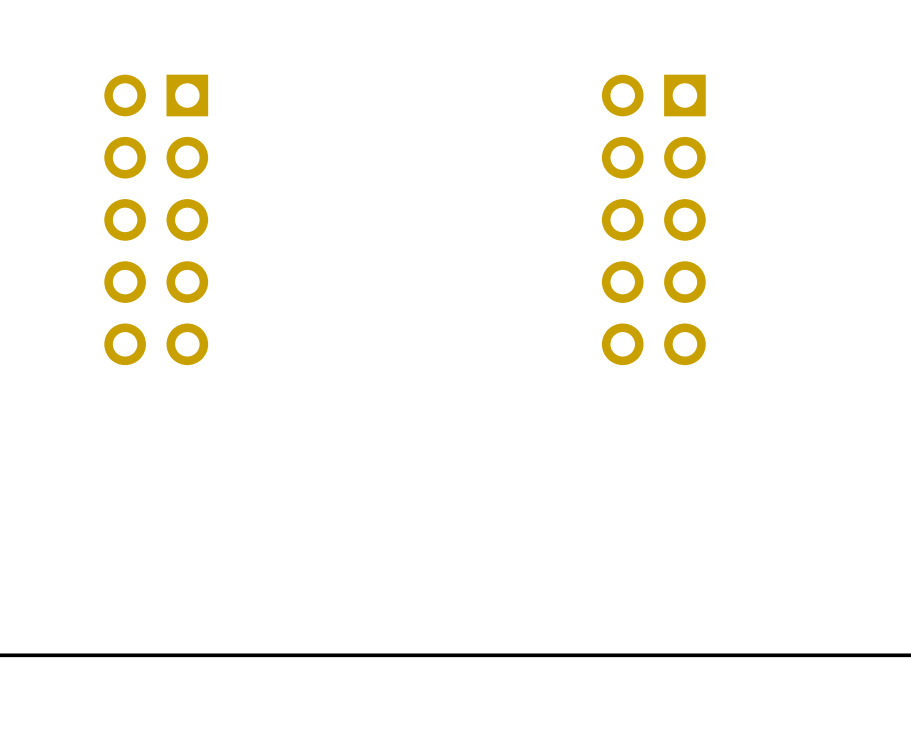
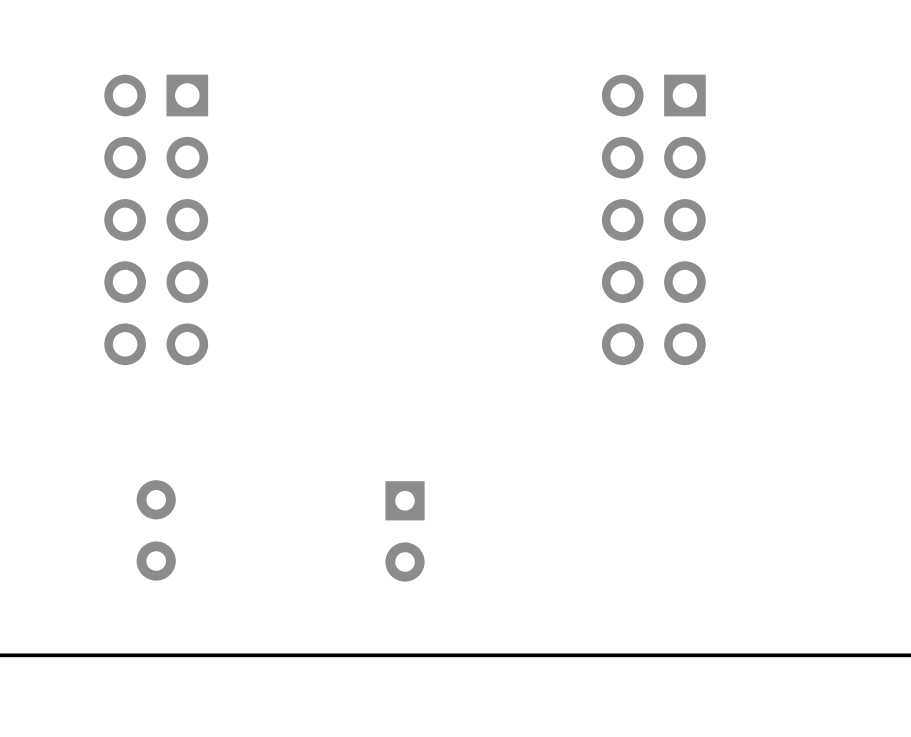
part: none -> (156, 530)
part: none -> (405, 531)

